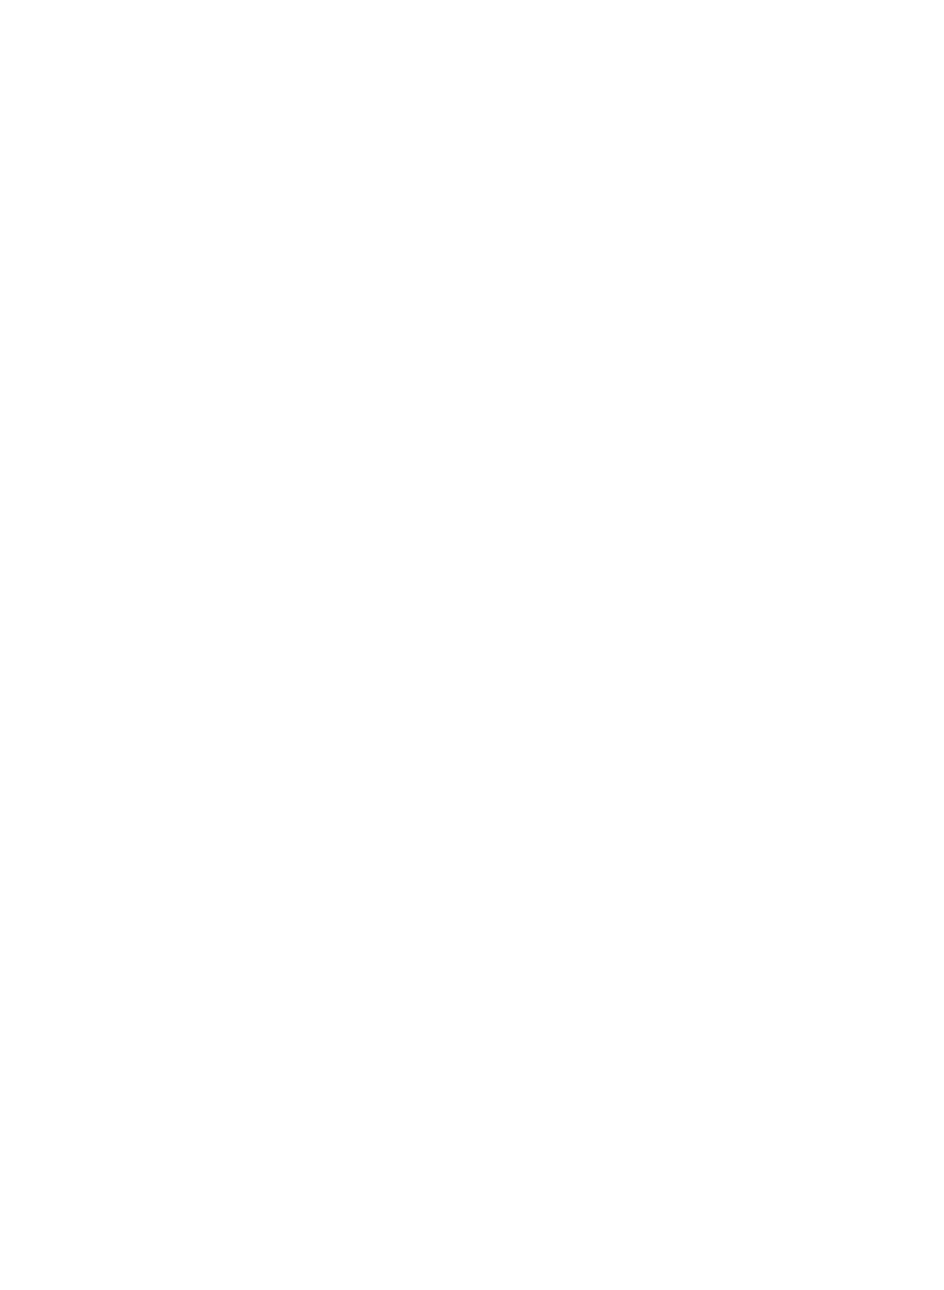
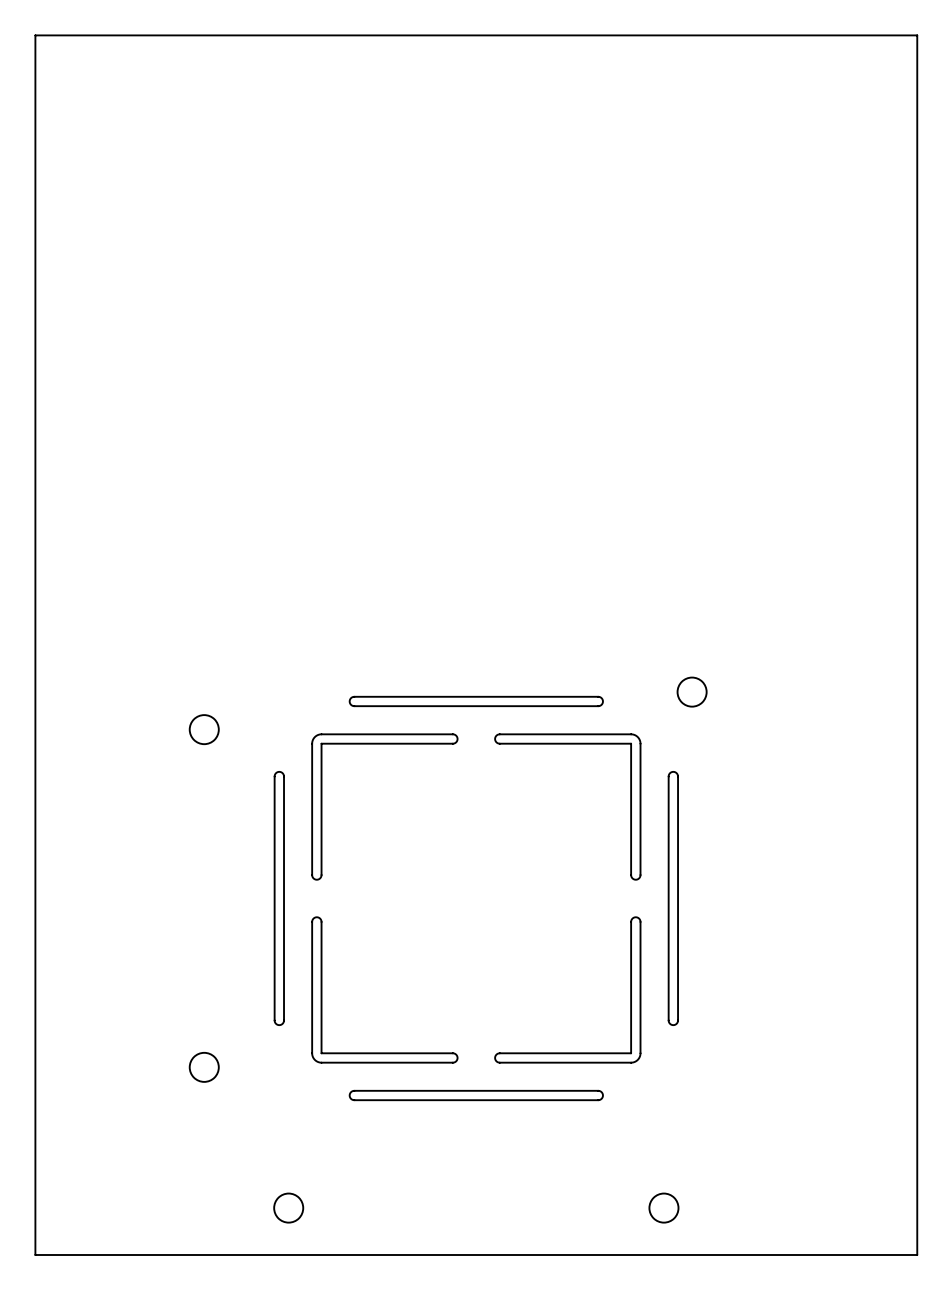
board edge: none -> (917, 35) (35, 35) (35, 1254) (917, 1254) (917, 35)
round board edge: none -> [676, 676, 708, 708]
board edge: none -> (598, 696) (354, 696) (349, 701) (354, 706) (598, 706) (602, 701) (598, 696)
round board edge: none -> [188, 714, 220, 746]
board edge: none -> (452, 734) (321, 734) (314, 737) (312, 743) (313, 878) (318, 879) (321, 875) (321, 743) (453, 743) (457, 739) (452, 734)
board edge: none -> (631, 734) (499, 734) (495, 739) (499, 743) (631, 743) (631, 875) (635, 879) (640, 875) (640, 743) (637, 737) (631, 734)
board edge: none -> (284, 776) (284, 1020) (279, 1025) (274, 1020) (274, 776) (279, 771) (284, 776)
board edge: none -> (678, 776) (678, 1020) (673, 1025) (668, 1020) (668, 776) (673, 771) (678, 776)
board edge: none -> (321, 921) (321, 1053) (452, 1053) (457, 1056) (456, 1061) (321, 1062) (314, 1059) (312, 1053) (312, 921) (316, 917) (321, 921)
board edge: none -> (640, 921) (640, 1053) (637, 1059) (631, 1062) (496, 1061) (495, 1056) (499, 1053) (631, 1053) (631, 921) (635, 917) (640, 921)
round board edge: none -> [188, 1051, 220, 1083]
board edge: none -> (598, 1090) (354, 1090) (349, 1095) (354, 1100) (598, 1100) (602, 1095) (598, 1090)
round board edge: none -> [273, 1192, 305, 1224]
round board edge: none -> [648, 1192, 680, 1224]

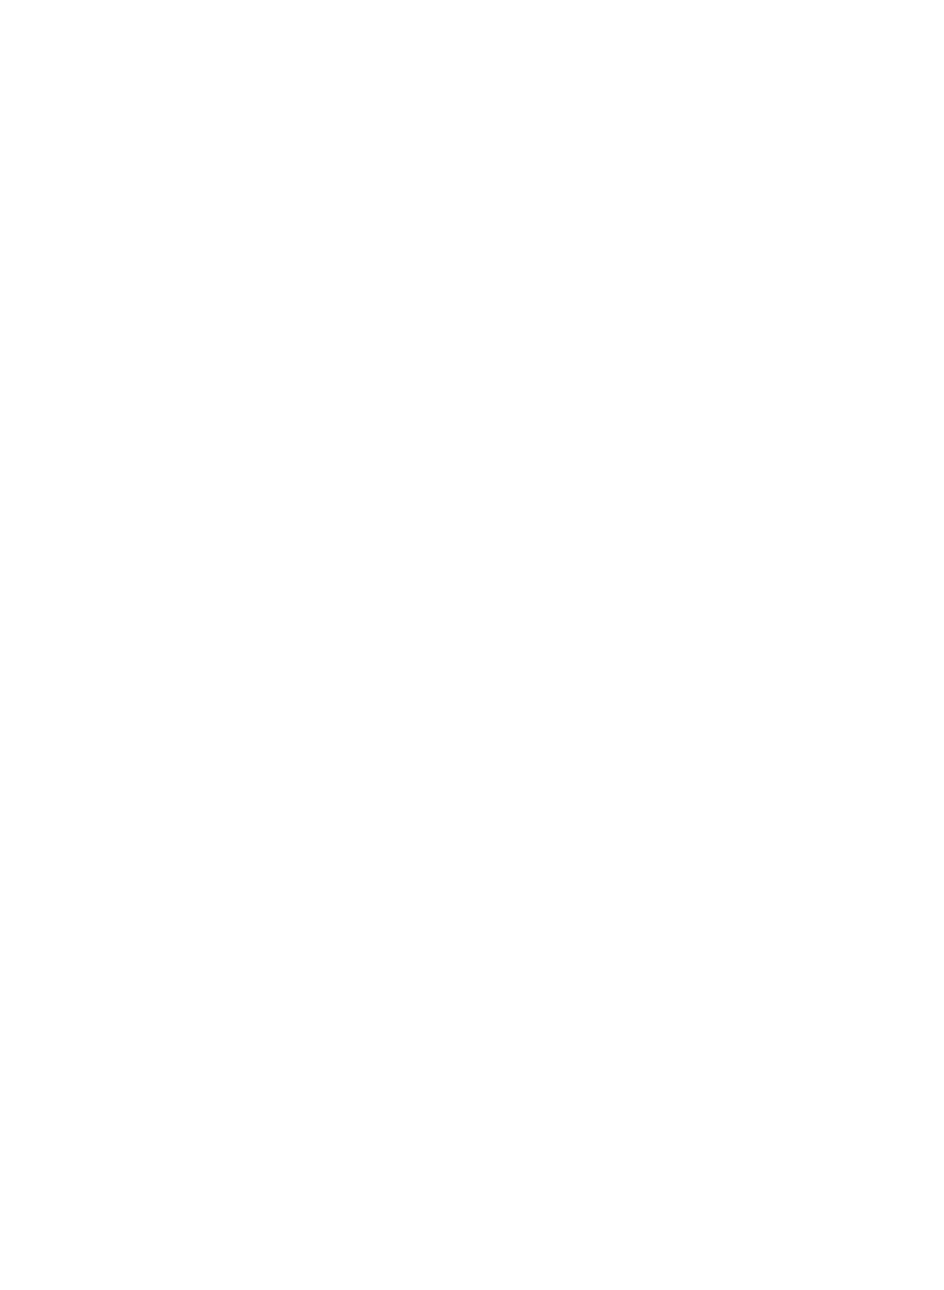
board edge: (917, 35) (35, 35) (35, 1254) (917, 1254) (917, 35) -> none
round board edge: [676, 676, 708, 708] -> none
board edge: (598, 696) (354, 696) (349, 701) (354, 706) (598, 706) (602, 701) (598, 696) -> none
round board edge: [188, 714, 220, 746] -> none
board edge: (452, 734) (321, 734) (314, 737) (312, 743) (313, 878) (318, 879) (321, 875) (321, 743) (453, 743) (457, 739) (452, 734) -> none
board edge: (631, 734) (499, 734) (495, 739) (499, 743) (631, 743) (631, 875) (635, 879) (640, 875) (640, 743) (637, 737) (631, 734) -> none
board edge: (284, 776) (284, 1020) (279, 1025) (274, 1020) (274, 776) (279, 771) (284, 776) -> none
board edge: (678, 776) (678, 1020) (673, 1025) (668, 1020) (668, 776) (673, 771) (678, 776) -> none
board edge: (321, 921) (321, 1053) (452, 1053) (457, 1056) (456, 1061) (321, 1062) (314, 1059) (312, 1053) (312, 921) (316, 917) (321, 921) -> none
board edge: (640, 921) (640, 1053) (637, 1059) (631, 1062) (496, 1061) (495, 1056) (499, 1053) (631, 1053) (631, 921) (635, 917) (640, 921) -> none
round board edge: [188, 1051, 220, 1083] -> none
board edge: (598, 1090) (354, 1090) (349, 1095) (354, 1100) (598, 1100) (602, 1095) (598, 1090) -> none
round board edge: [273, 1192, 305, 1224] -> none
round board edge: [648, 1192, 680, 1224] -> none

